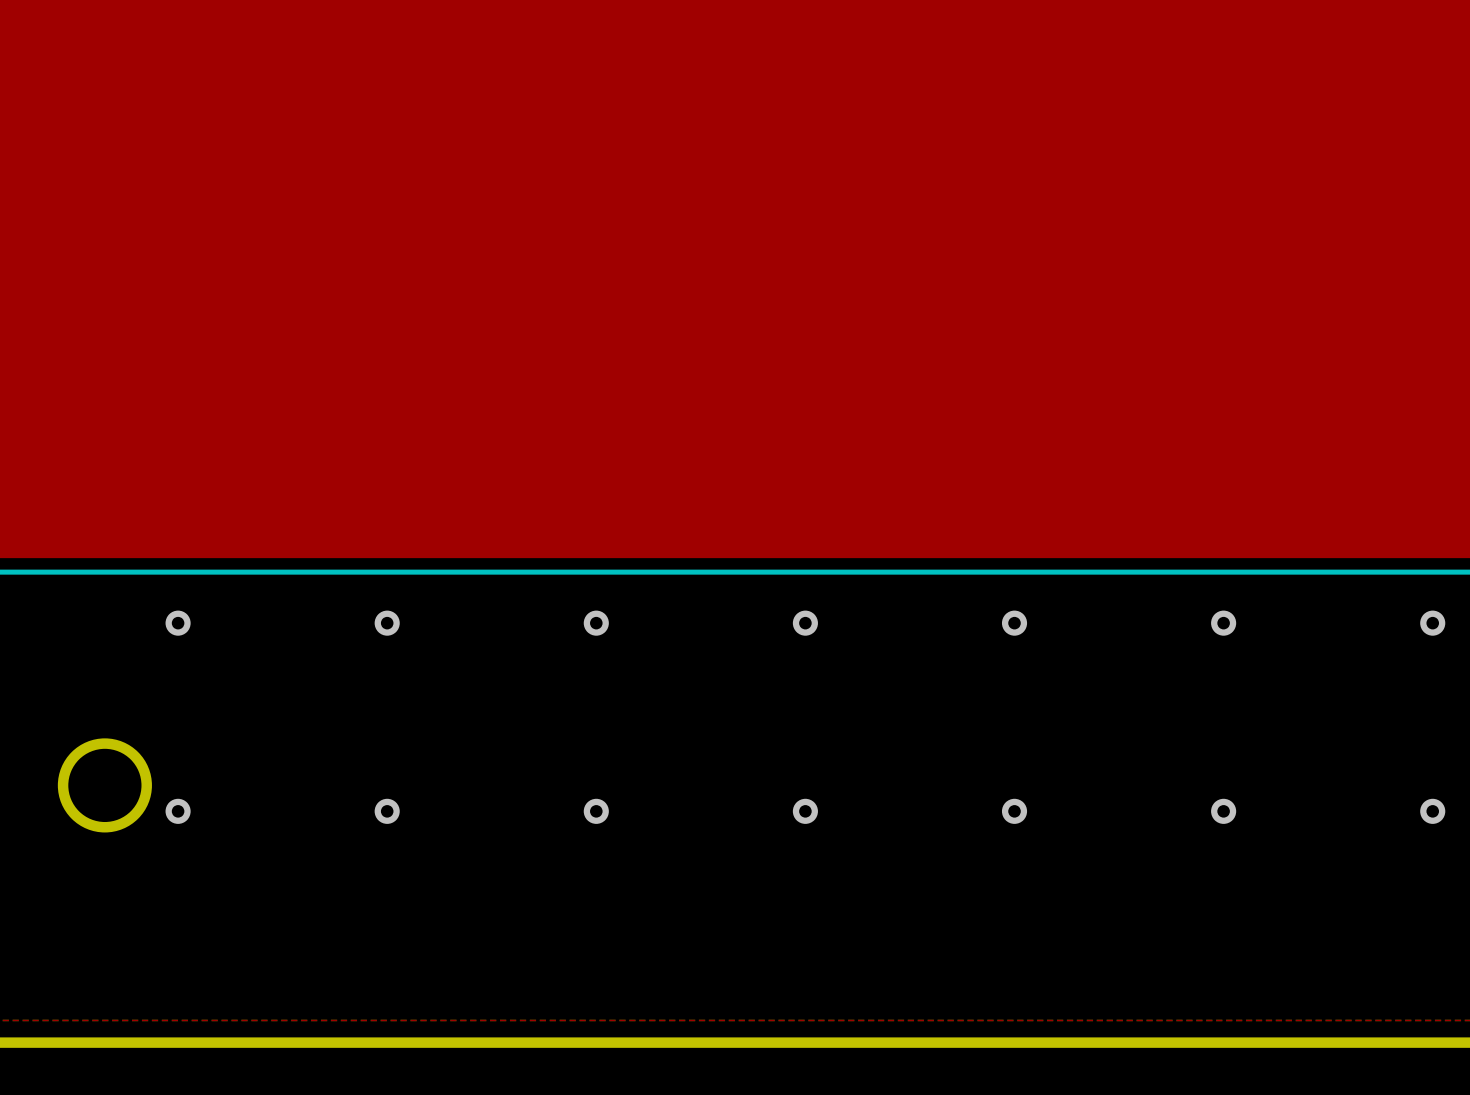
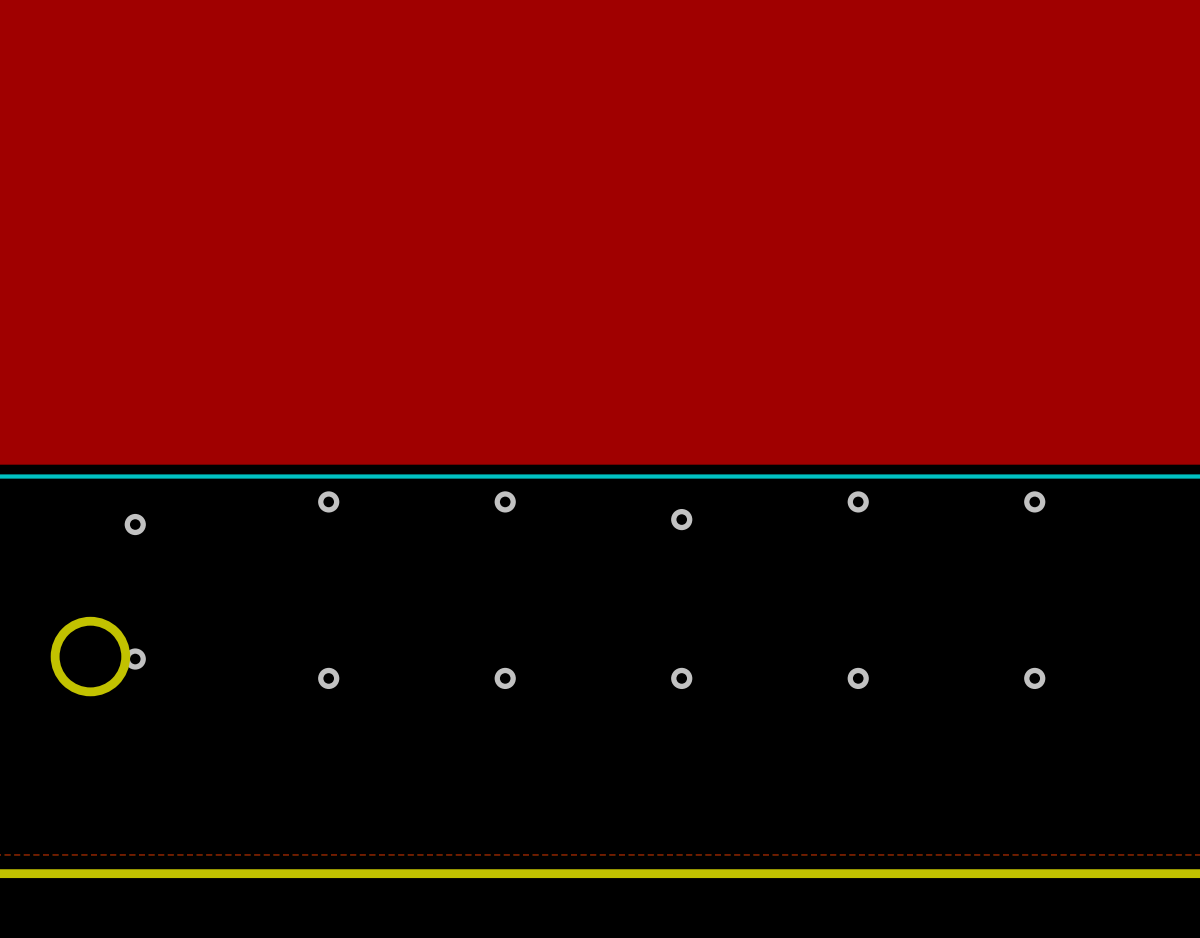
via position: (178, 623) -> (135, 524)
via position: (387, 623) -> (328, 501)
via position: (596, 623) -> (505, 501)
via position: (1014, 623) -> (858, 501)
via position: (1223, 623) -> (1034, 501)
via position: (178, 811) -> (135, 659)

